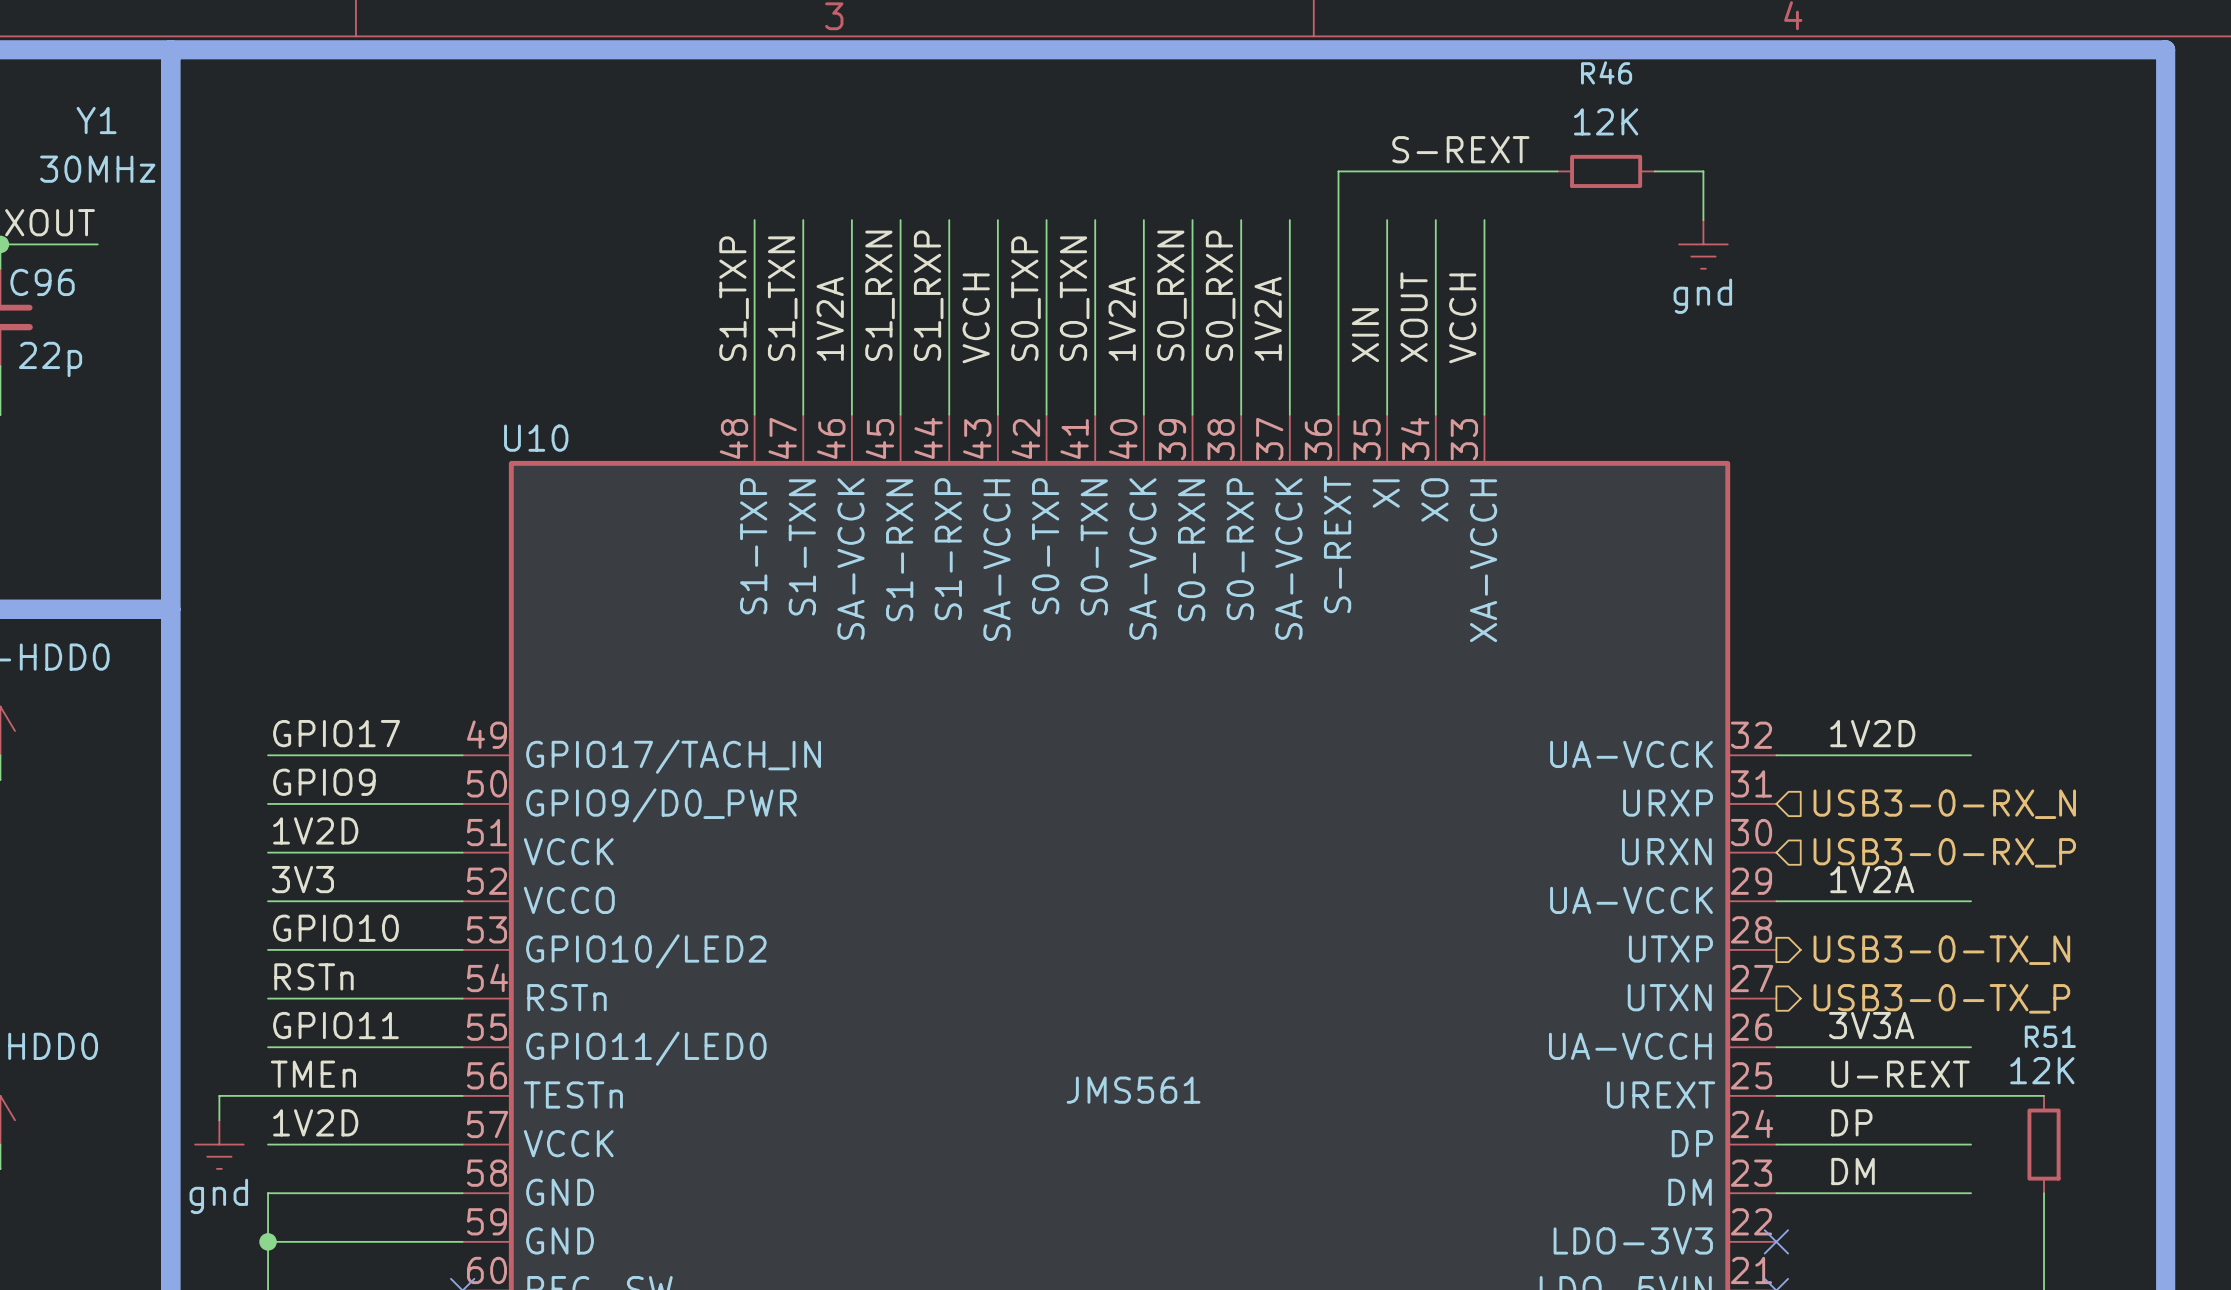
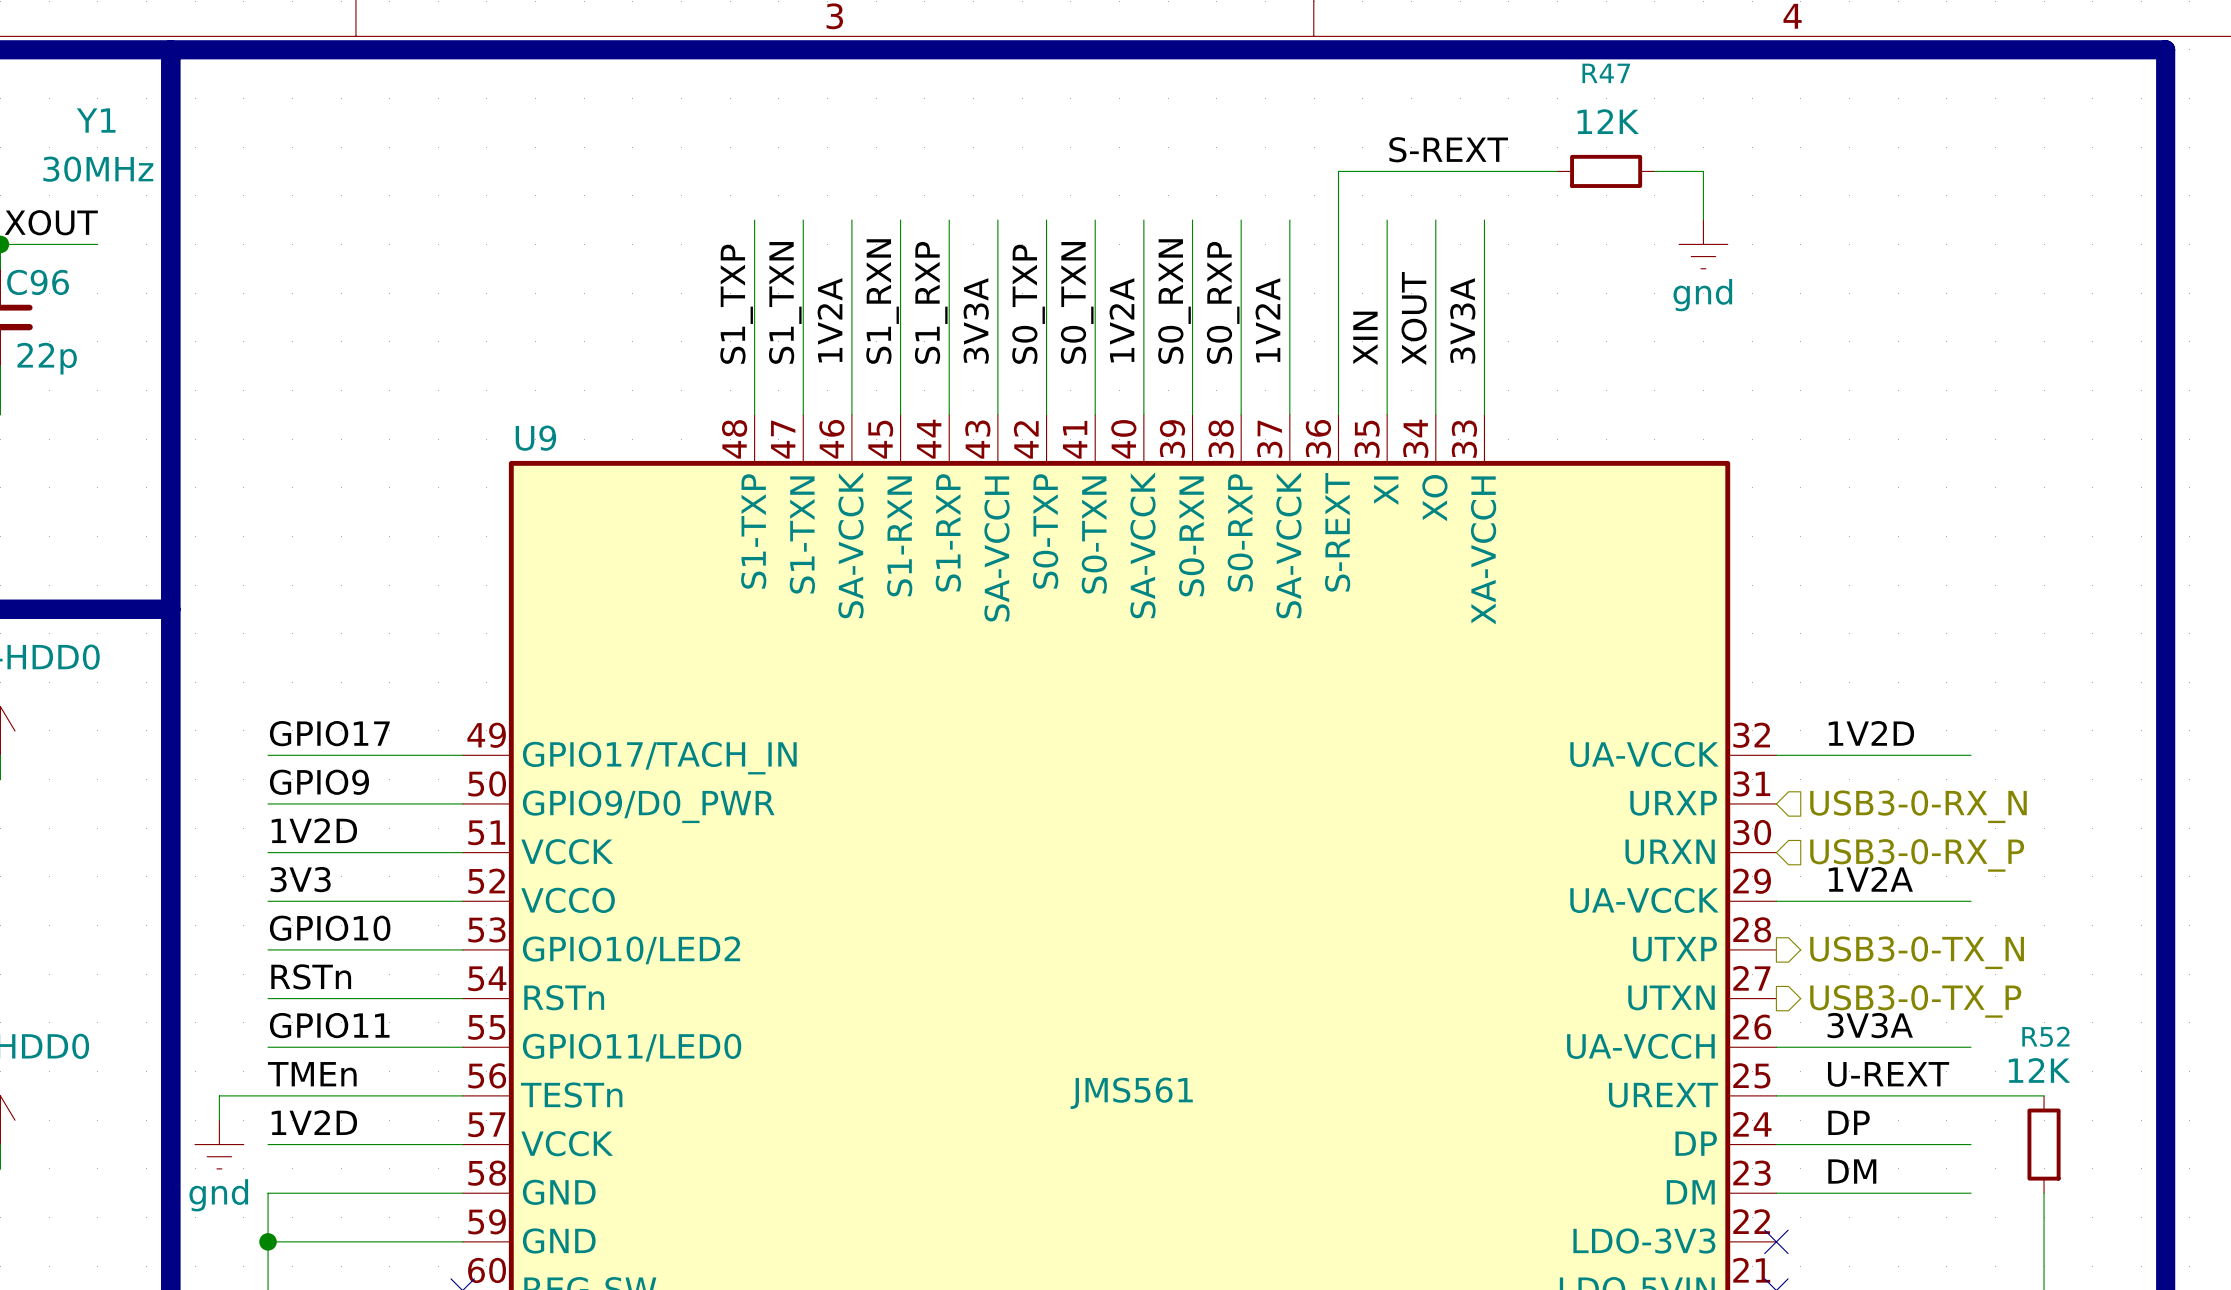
R46 name: R46 (1606, 72) -> R47 (1606, 73)
label: VCCH (976, 318) -> 3V3A (976, 320)
label: VCCH (1462, 318) -> 3V3A (1462, 320)
U10 name: U10 (536, 438) -> U9 (535, 438)
R51 name: R51 (2050, 1036) -> R52 (2045, 1036)

